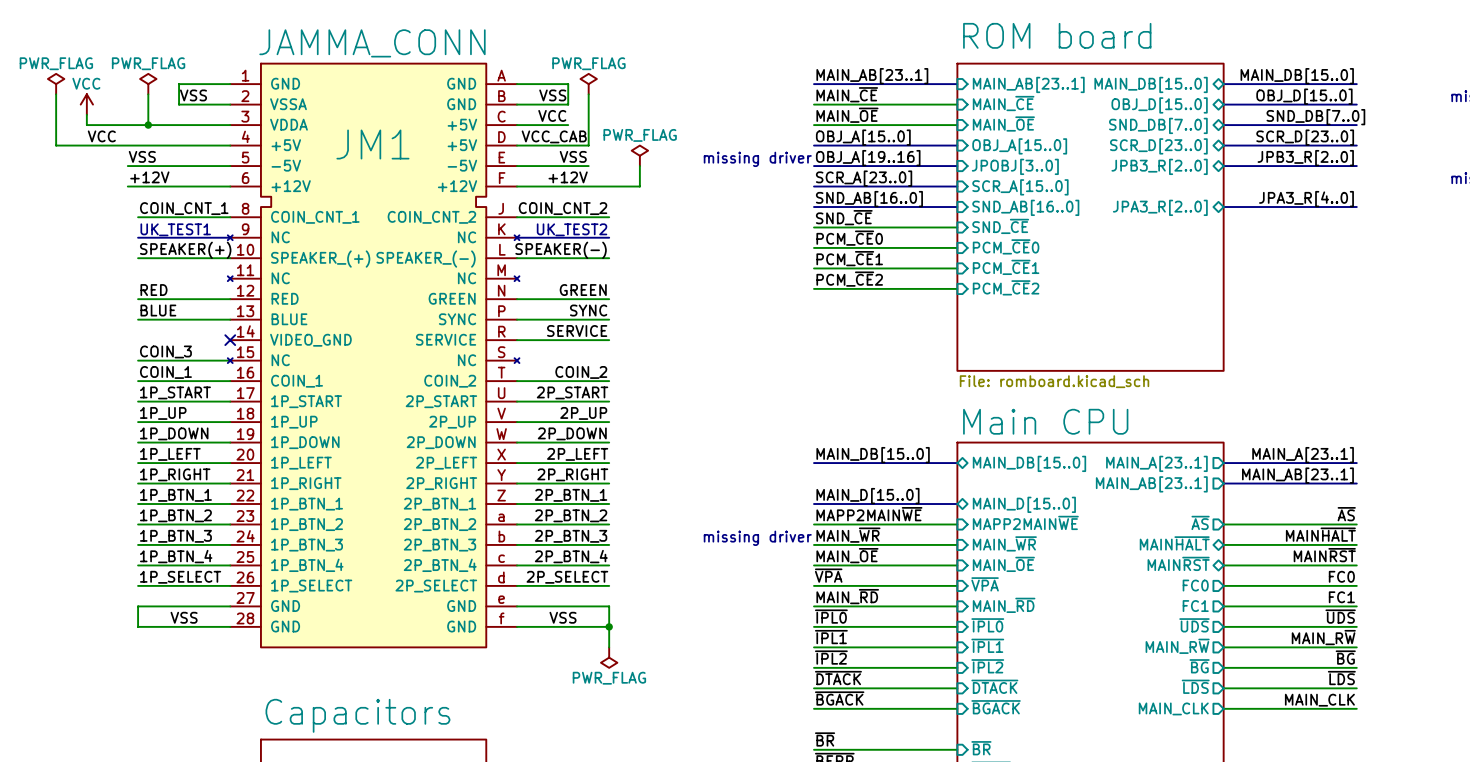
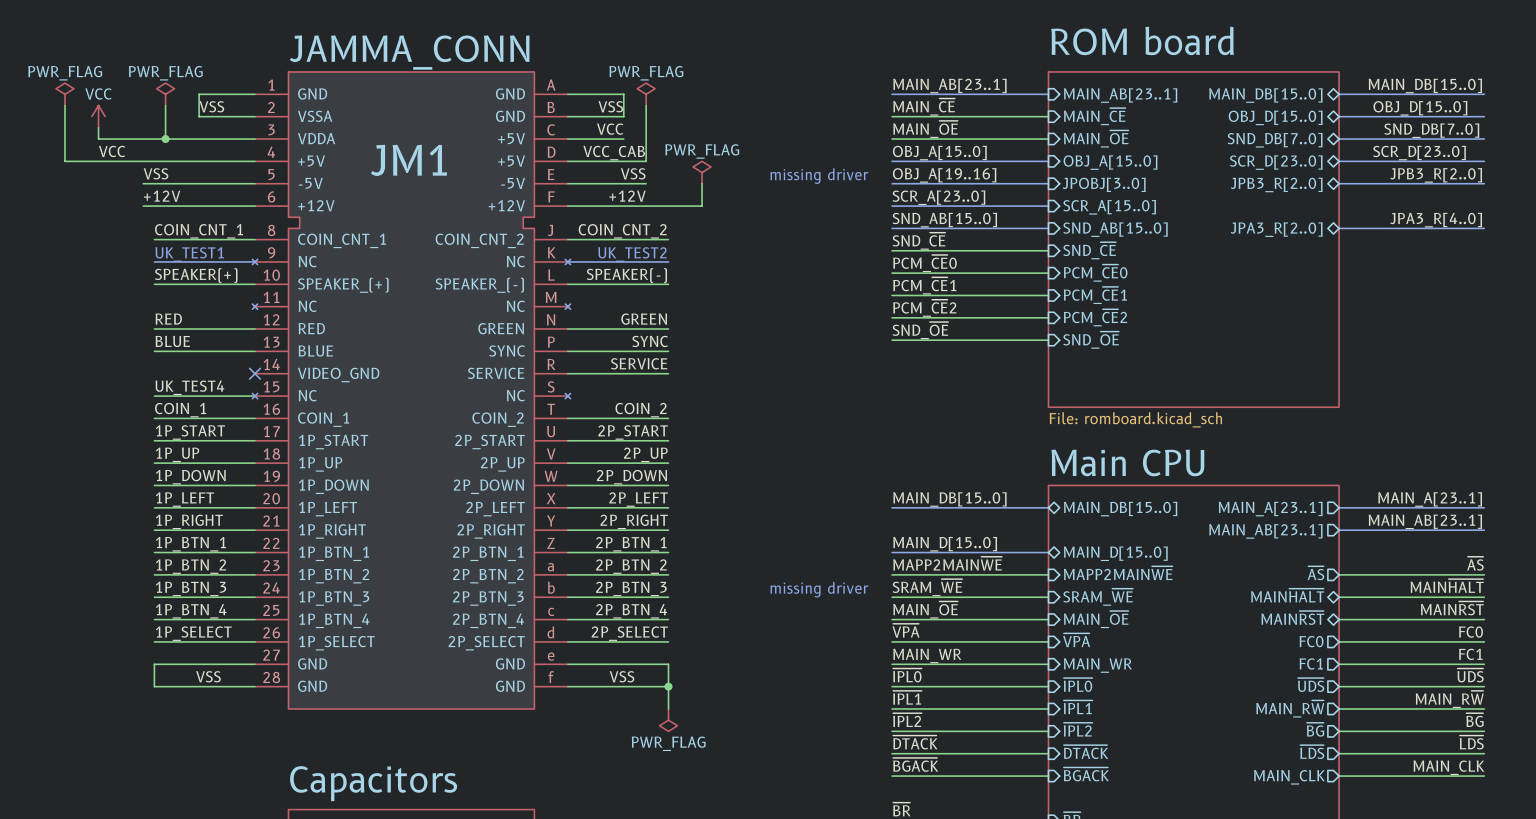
label: SND_AB[16..0] (869, 199) -> SND_AB[15..0] (944, 220)
sheet pin: SND_AB[16..0] (1025, 207) -> SND_AB[15..0] (1115, 229)
label: none -> SND_~{OE} (920, 330)
sheet pin: none -> SND_~{OE} (1091, 340)
wire: none -> (892, 340) (1048, 340)
label: COIN_3 (165, 351) -> UK_TEST4 (189, 387)
label: MAIN_~{WR} (848, 535) -> SRAM_~{WE} (927, 587)
sheet pin: MAIN_~{WR} (1004, 543) -> SRAM_~{WE} (1098, 597)
label: MAIN_~{RD} (847, 596) -> MAIN_WR (927, 655)
sheet pin: MAIN_~{RD} (1004, 605) -> MAIN_WR (1097, 665)

